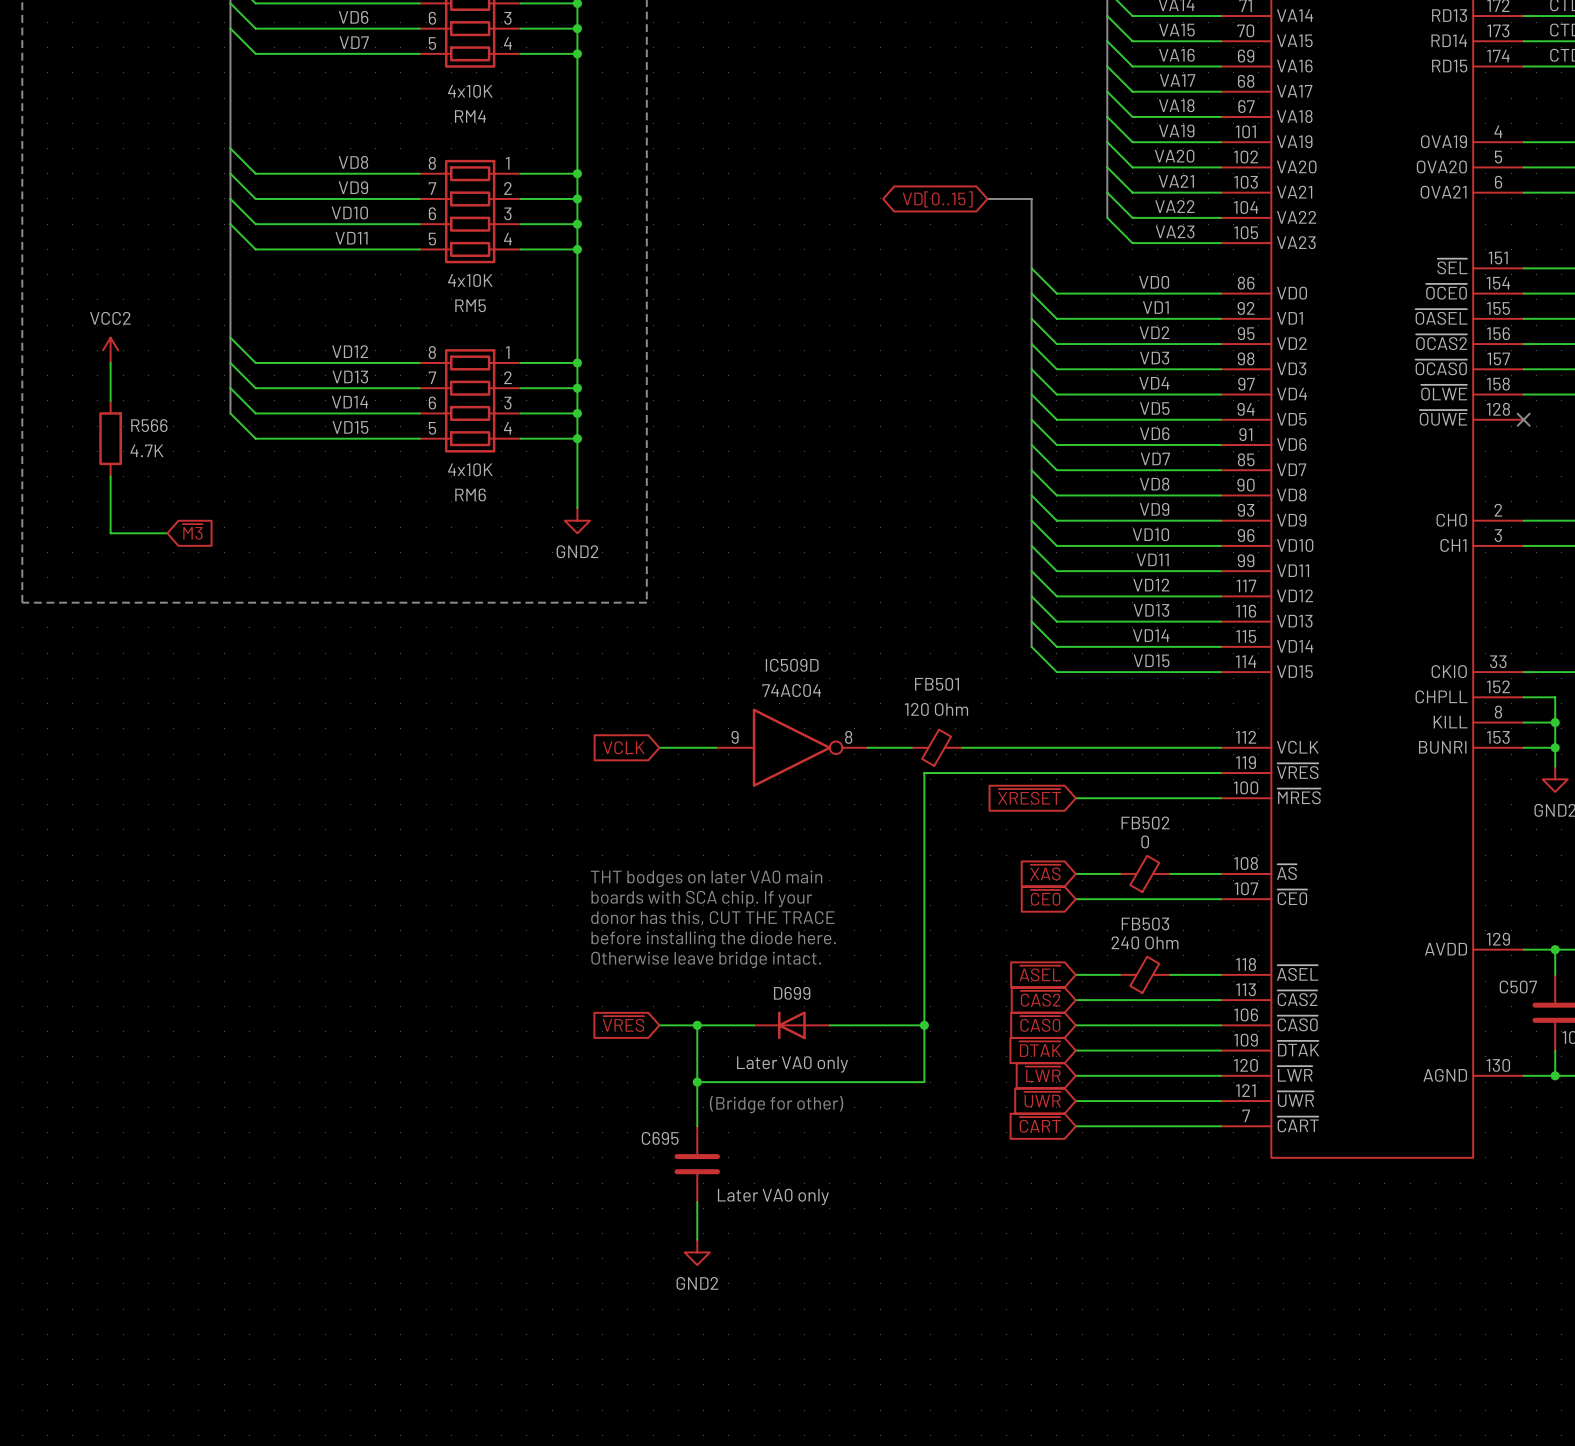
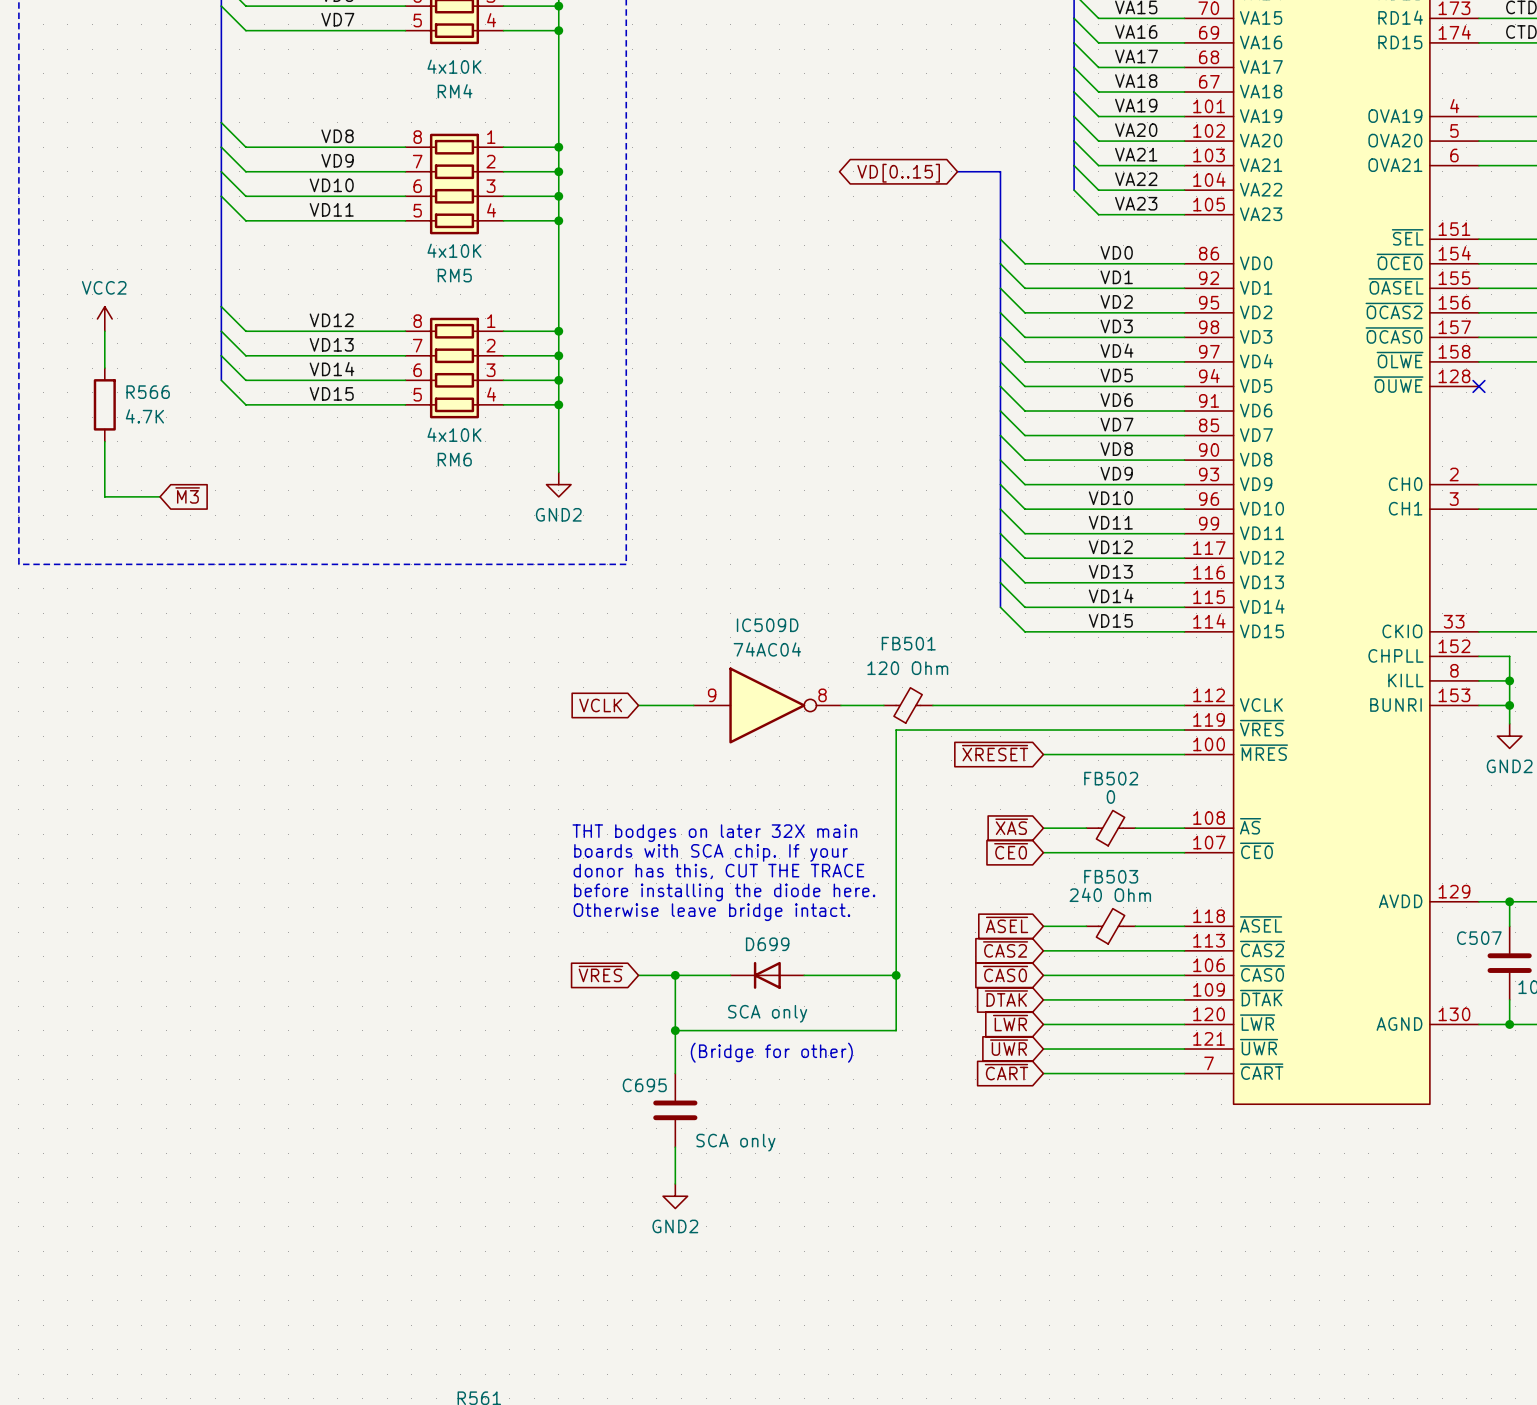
text: THT bodges on later VA0 main (706, 878) -> THT bodges on later 32X main (714, 833)
D699 value: Later VA0 only (792, 1064) -> SCA only (767, 1013)
C695 value: Later VA0 only (773, 1196) -> SCA only (735, 1142)

